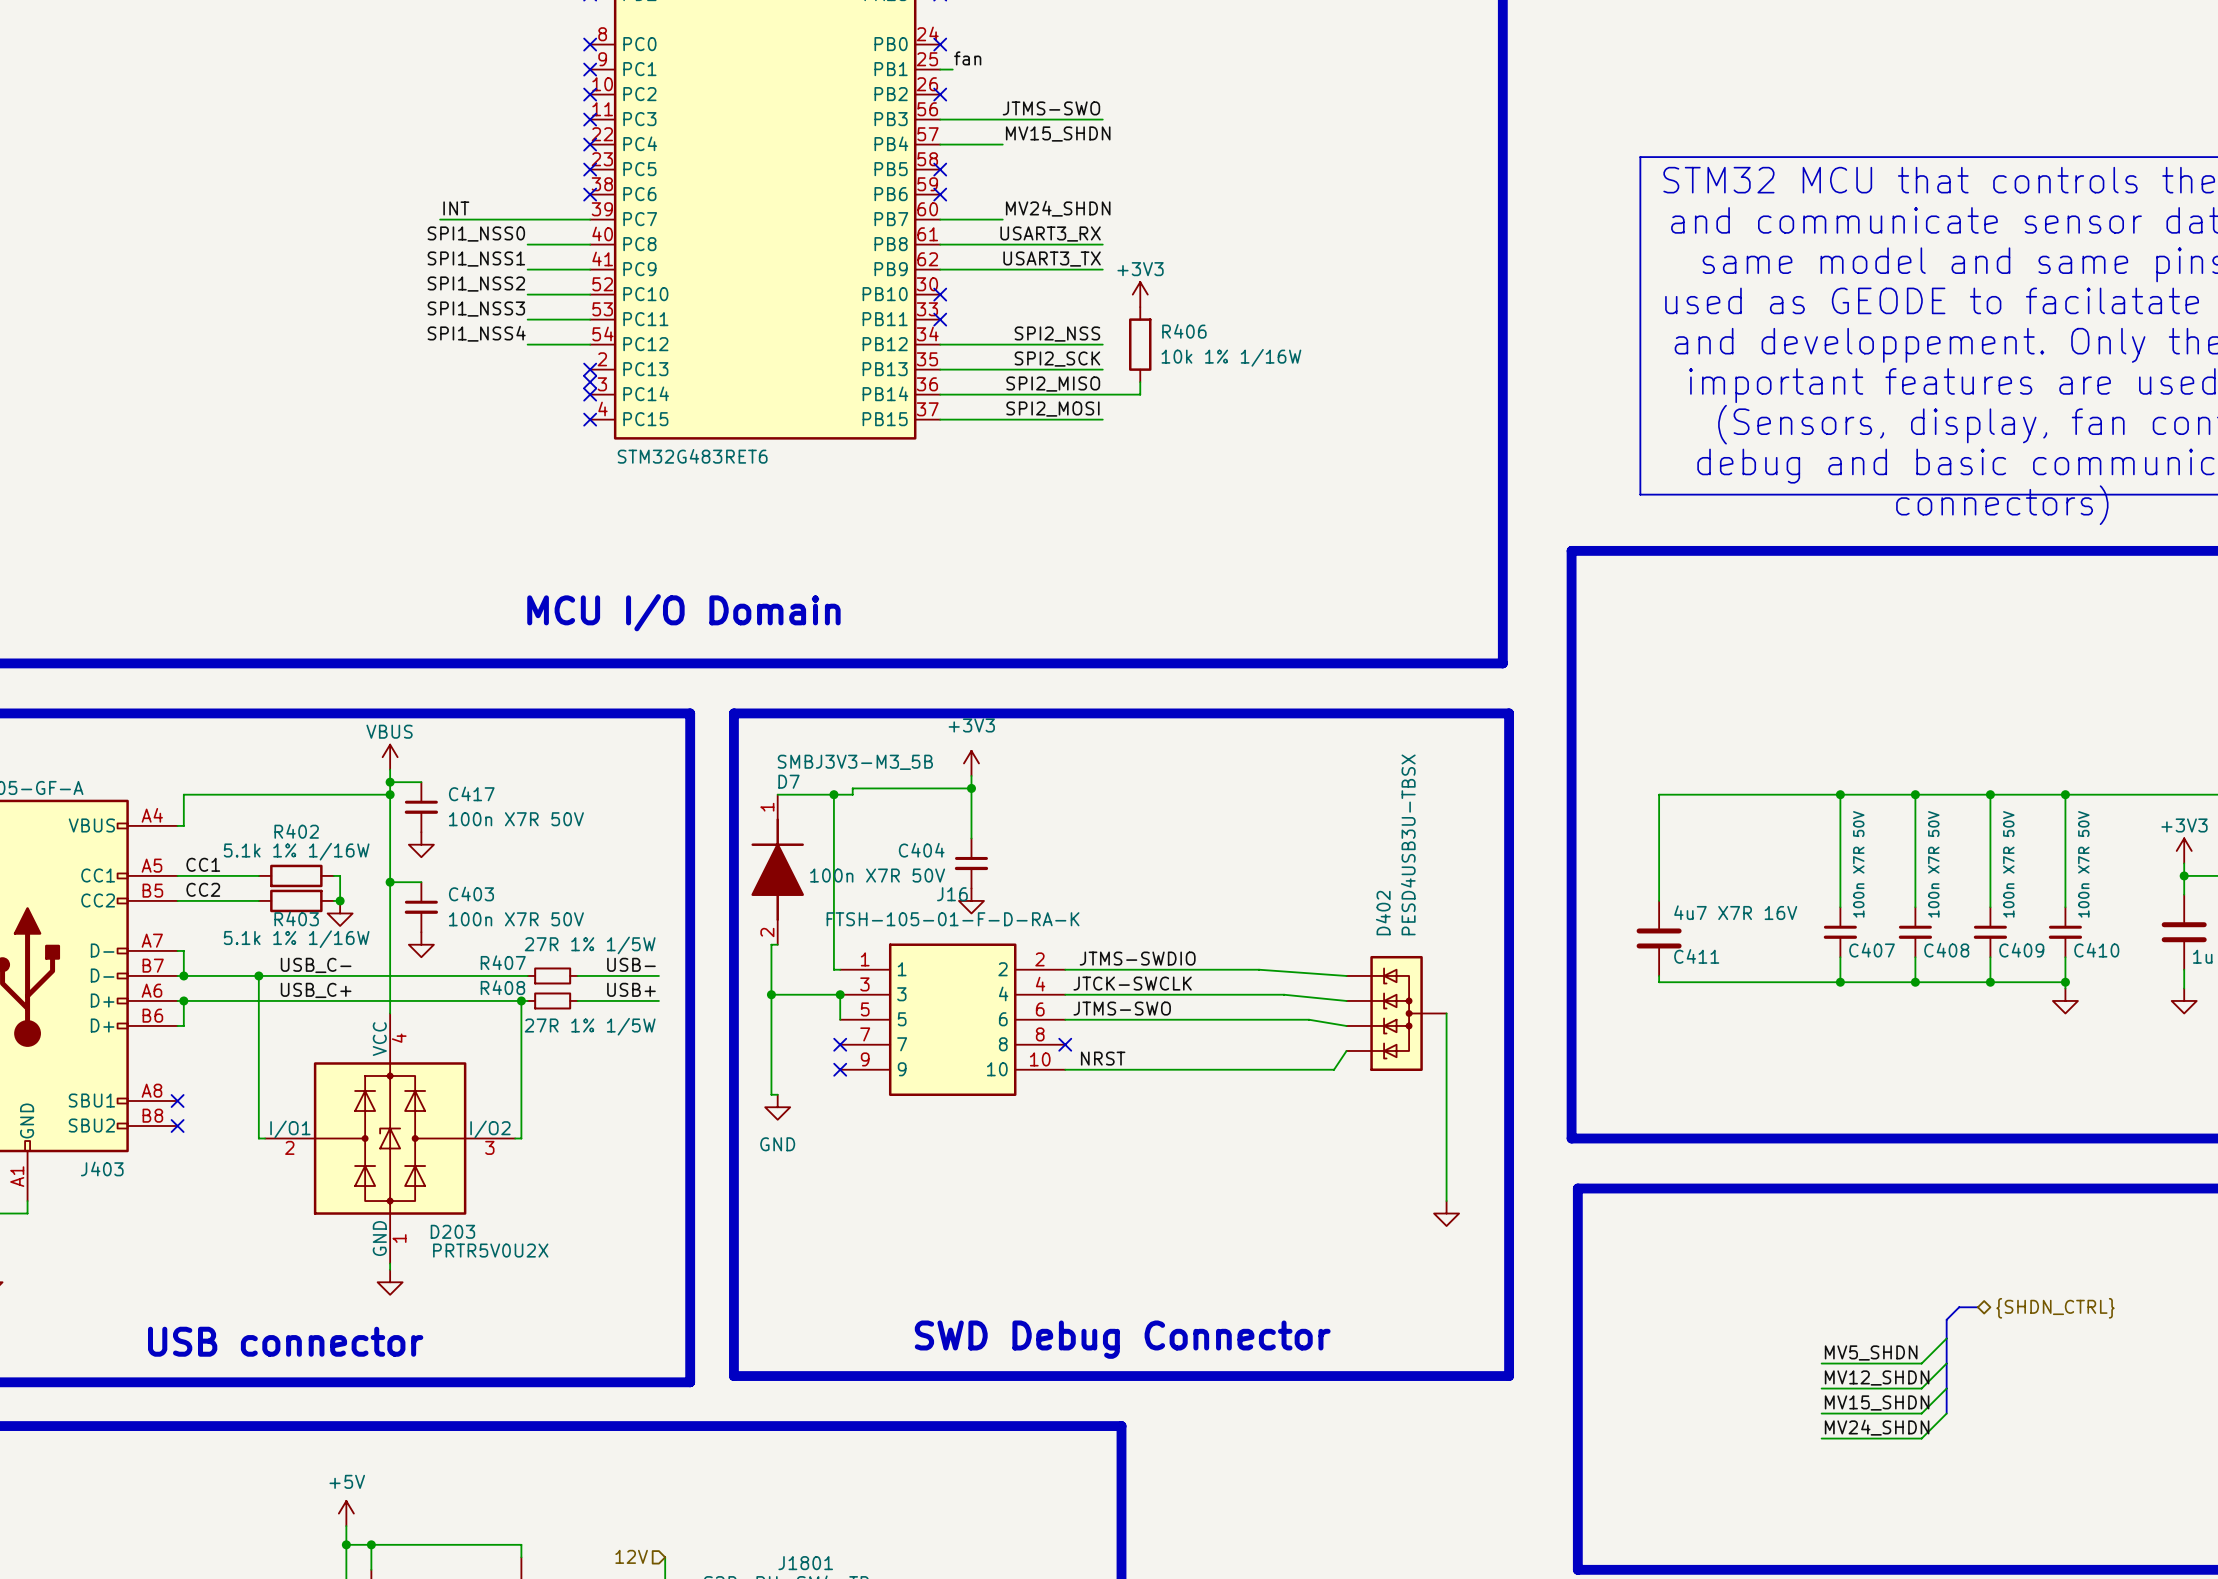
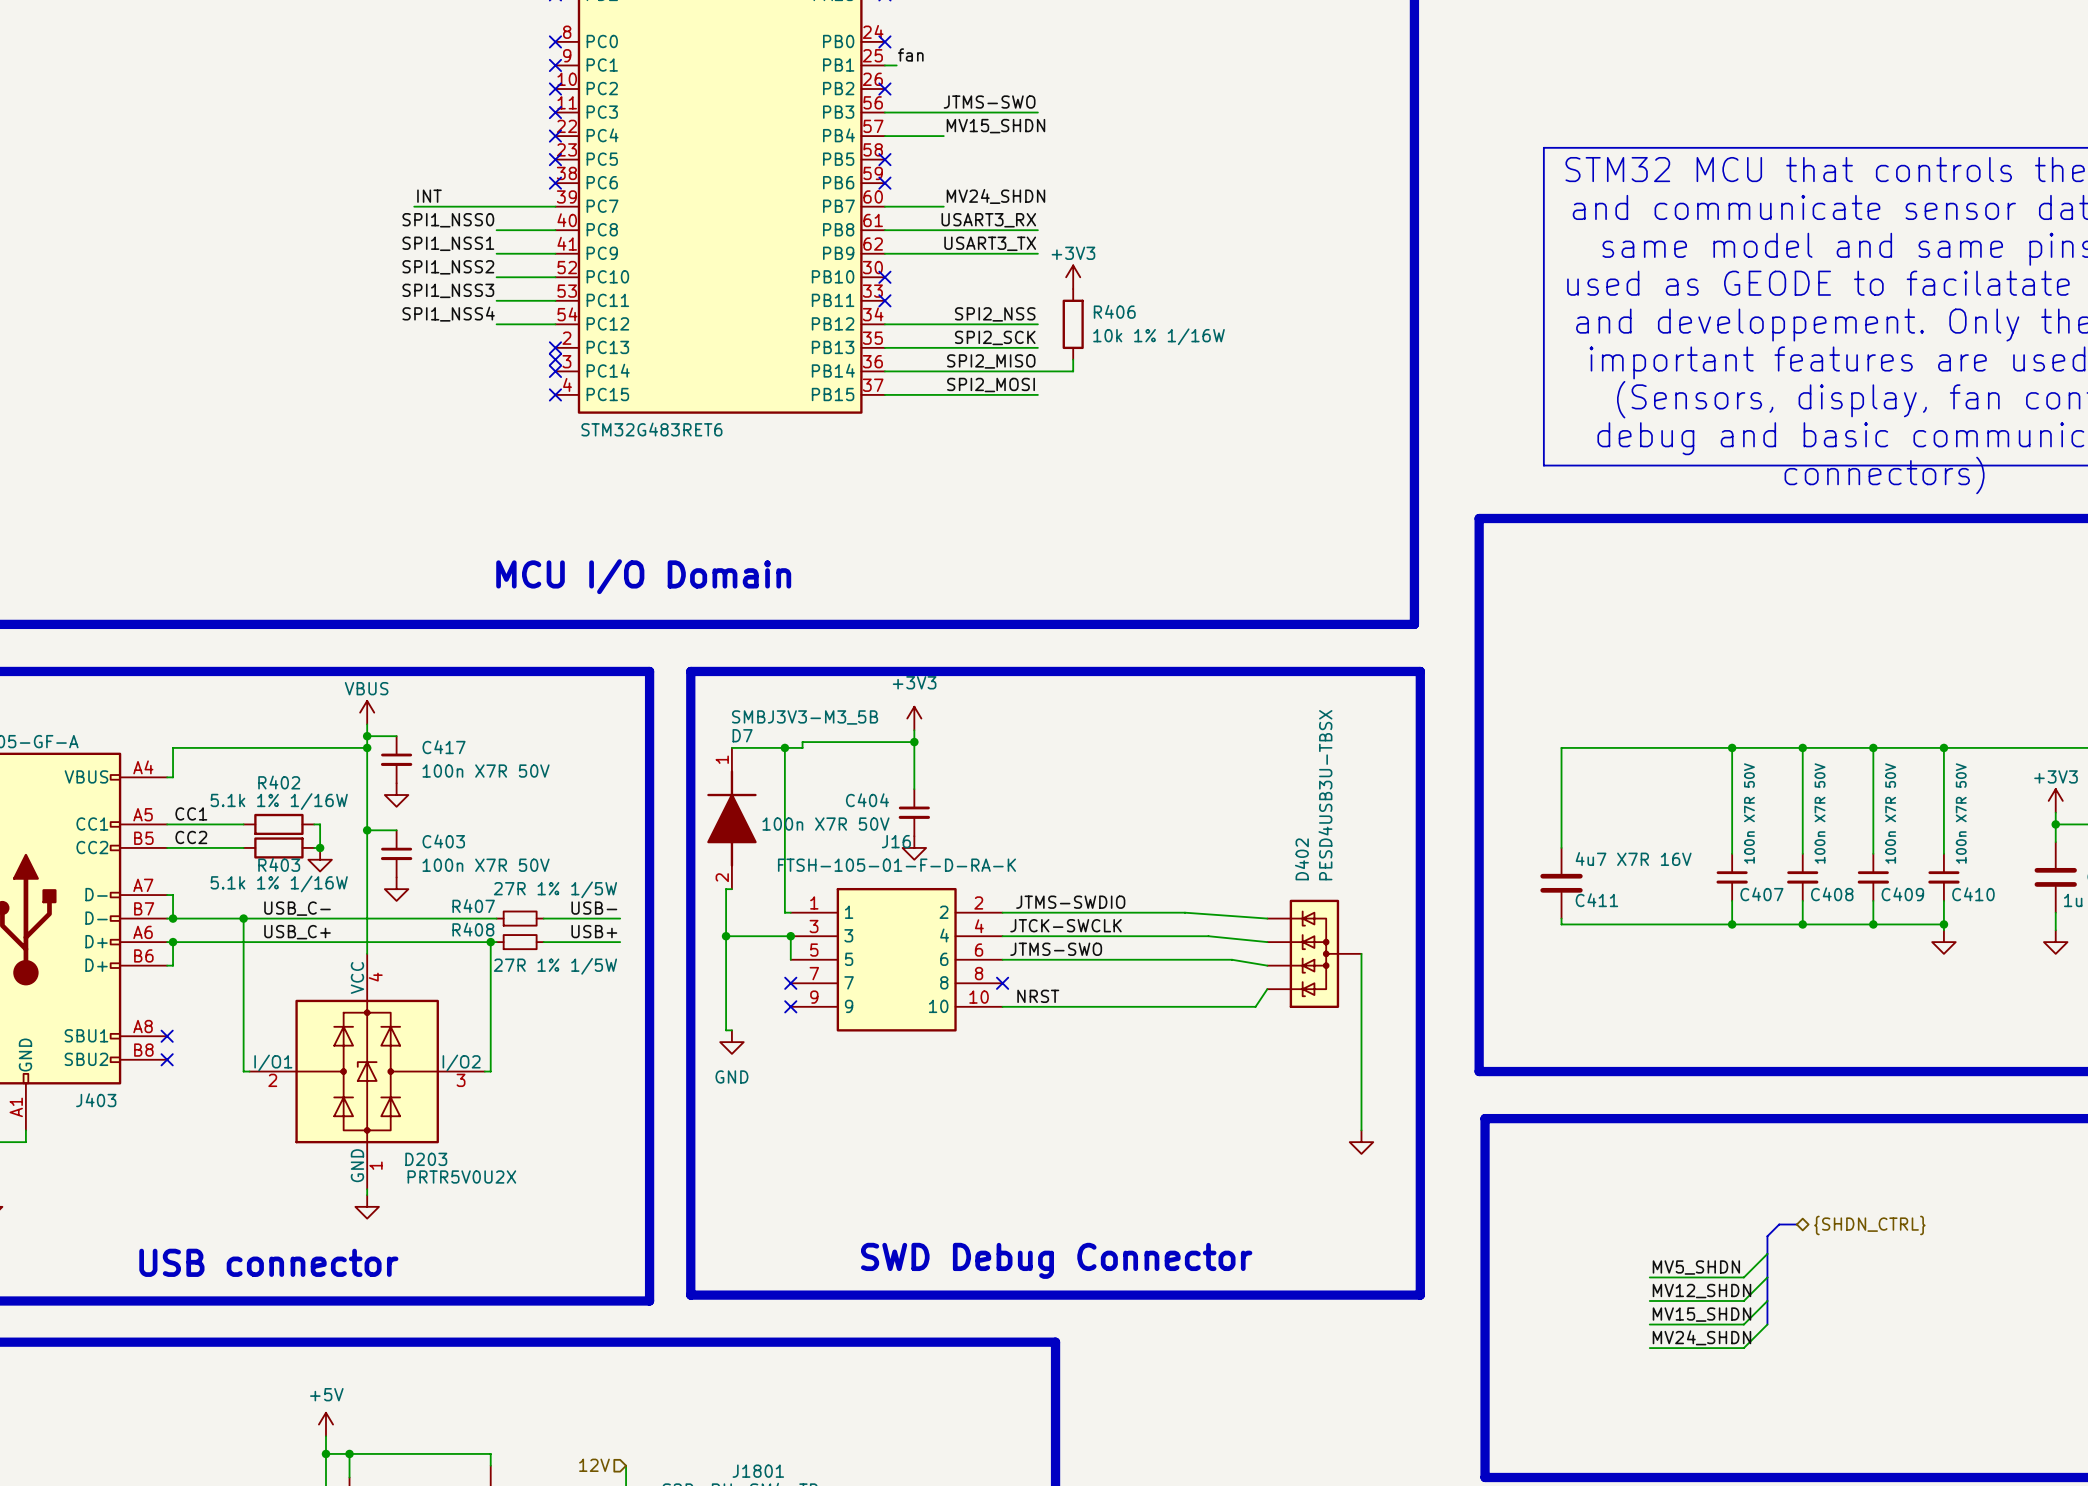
bus: (1977, 1307) (1959, 1307) (1946, 1319) (1946, 1413) -> (1796, 1224) (1779, 1224) (1767, 1236) (1767, 1324)
hierarchical label position: {SHDN_CTRL} (2055, 1308) -> {SHDN_CTRL} (1869, 1225)
wire: none -> (1767, 1253) (1743, 1277) (1649, 1277)
wire: (1946, 1338) (1921, 1363) -> none
label position: MV5_SHDN (1871, 1352) -> MV5_SHDN (1696, 1267)
wire: none -> (1767, 1277) (1743, 1300) (1649, 1300)
wire: (1821, 1363) (1921, 1363) -> none
wire: (1946, 1363) (1921, 1388) -> none
label position: MV12_SHDN (1877, 1377) -> MV12_SHDN (1701, 1291)
wire: none -> (1767, 1300) (1743, 1324) (1649, 1324)
wire: (1821, 1388) (1921, 1388) -> none
wire: (1946, 1388) (1921, 1413) -> none
label position: MV15_SHDN (1877, 1402) -> MV15_SHDN (1701, 1314)
wire: none -> (1767, 1324) (1743, 1348) (1649, 1348)
wire: (1821, 1413) (1921, 1413) -> none
wire: (1946, 1413) (1921, 1438) -> none
label position: MV24_SHDN (1877, 1427) -> MV24_SHDN (1701, 1337)
wire: (1821, 1438) (1921, 1438) -> none

